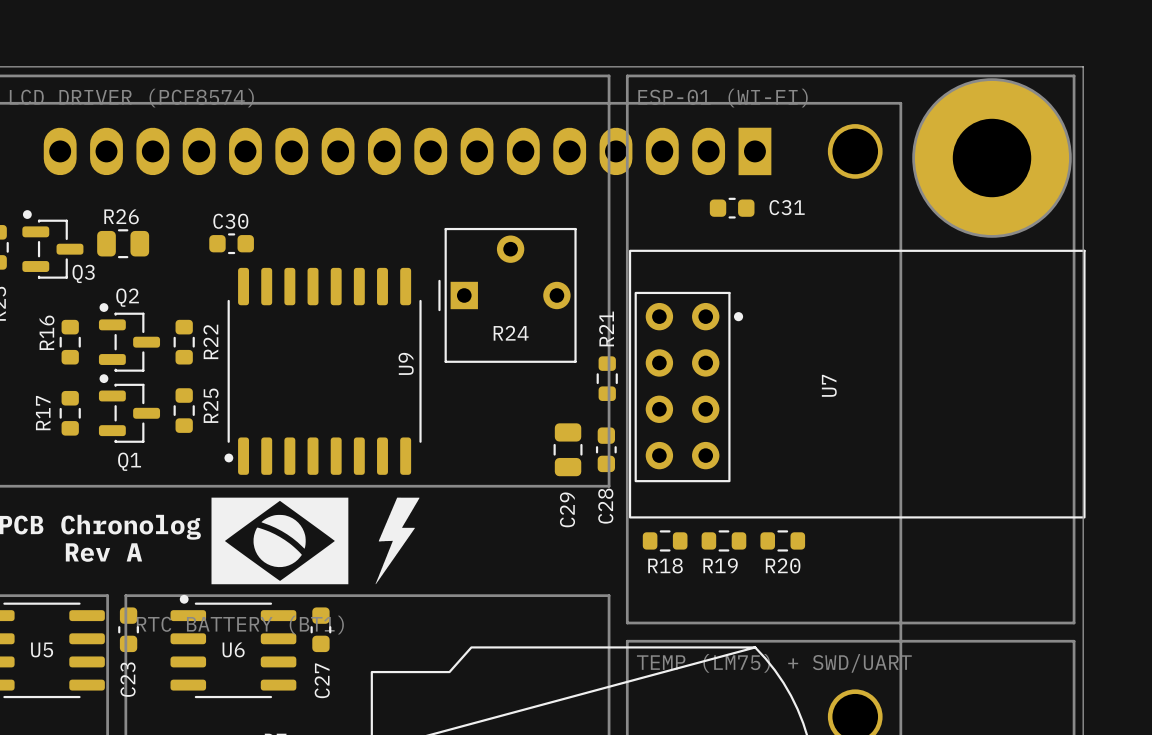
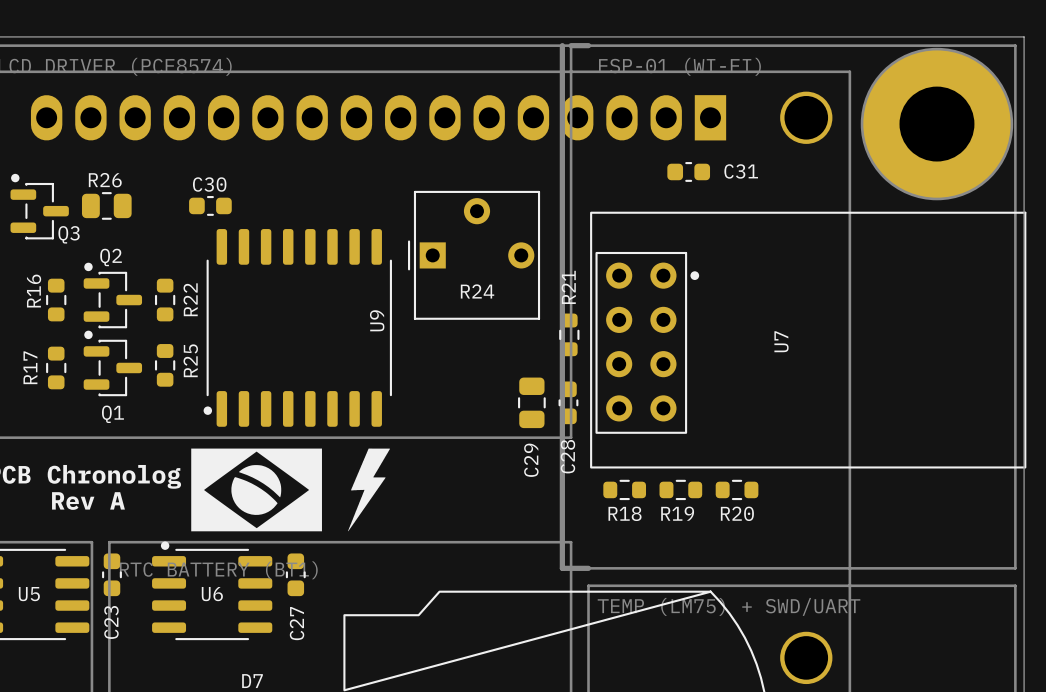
line: none -> (571, 45) (588, 45)
line: (627, 75) (627, 623) -> (562, 45) (562, 568) (588, 568)

